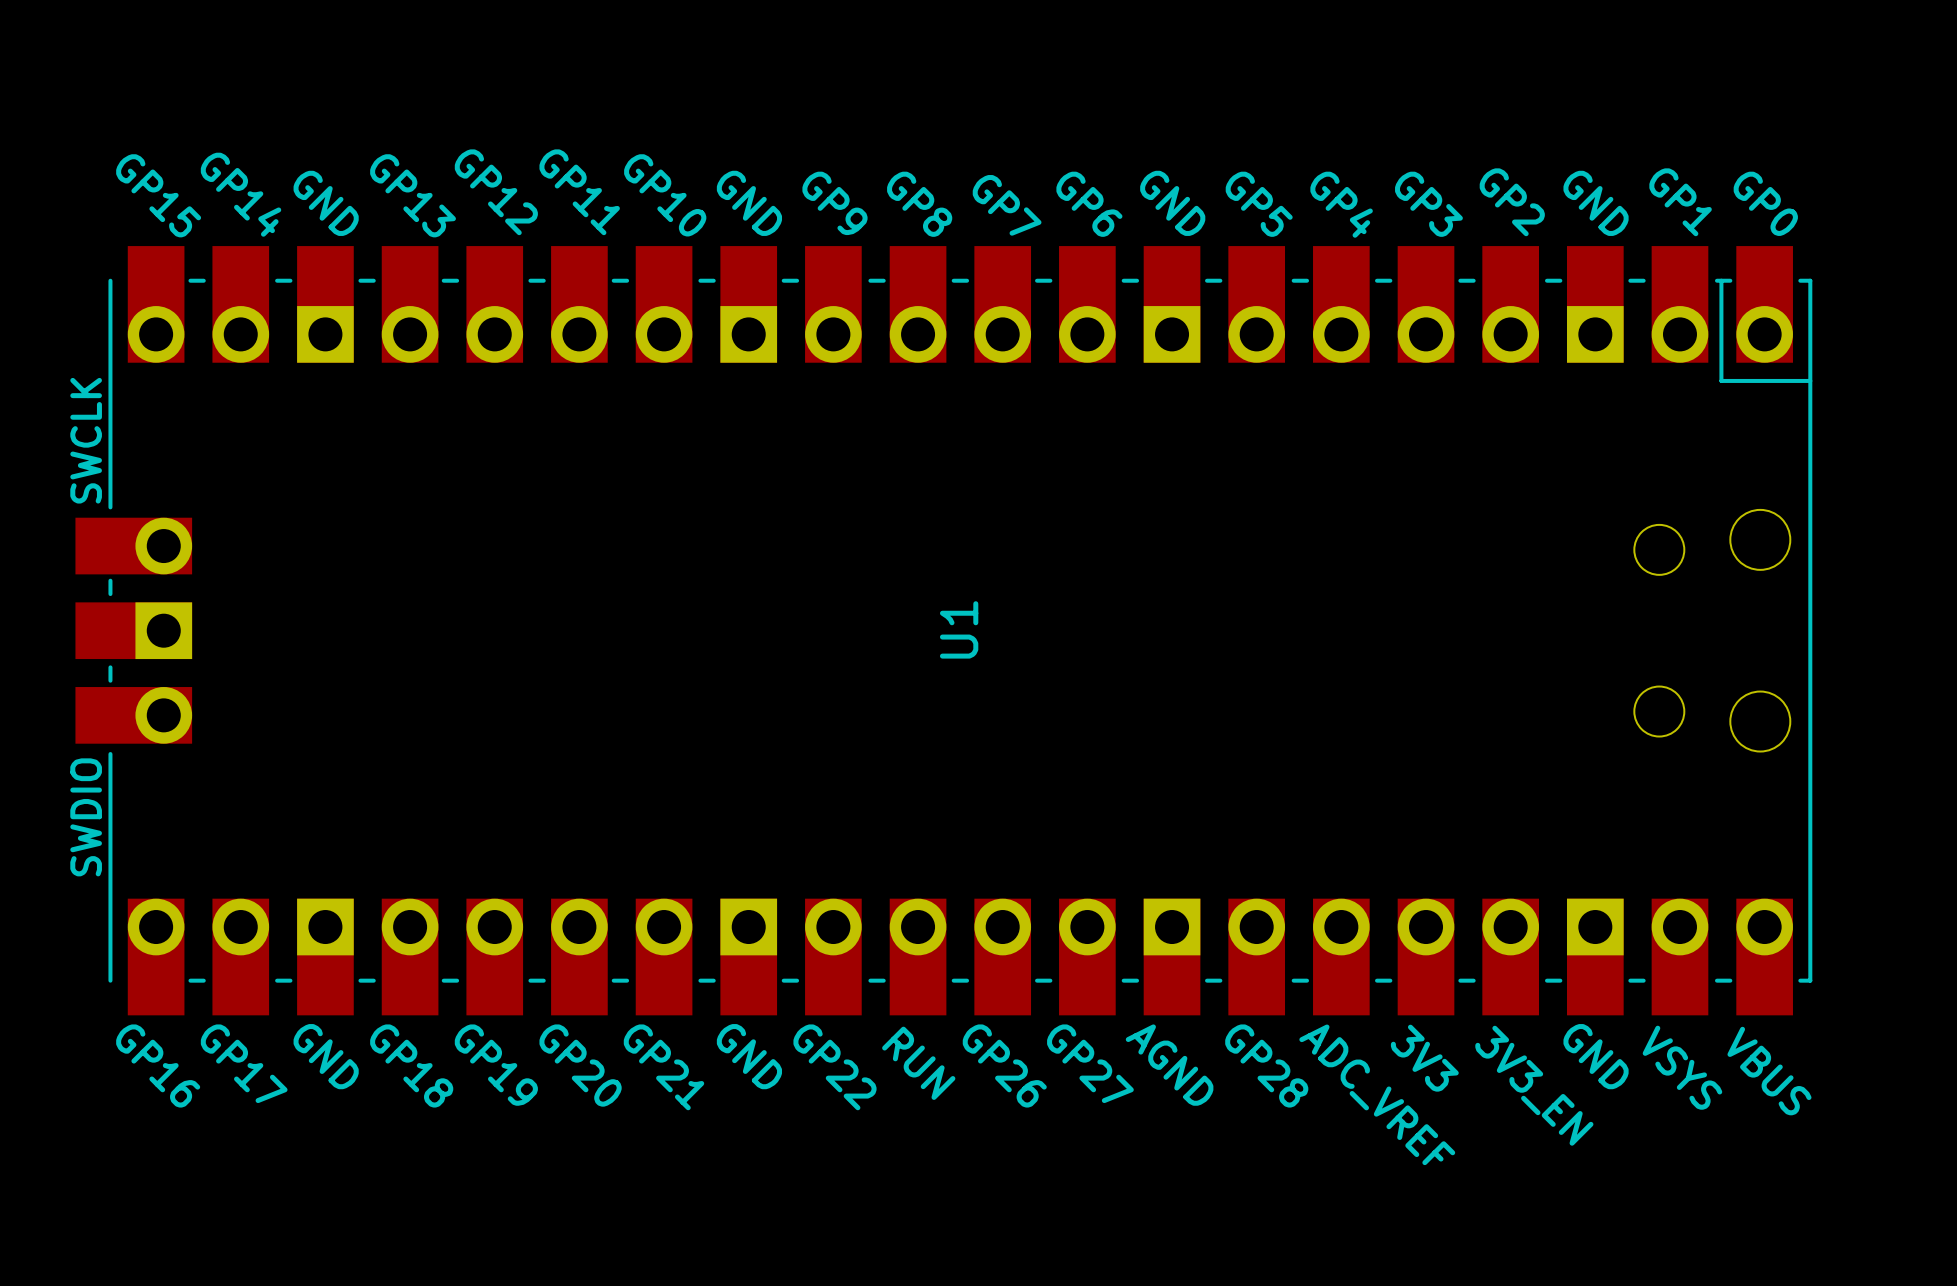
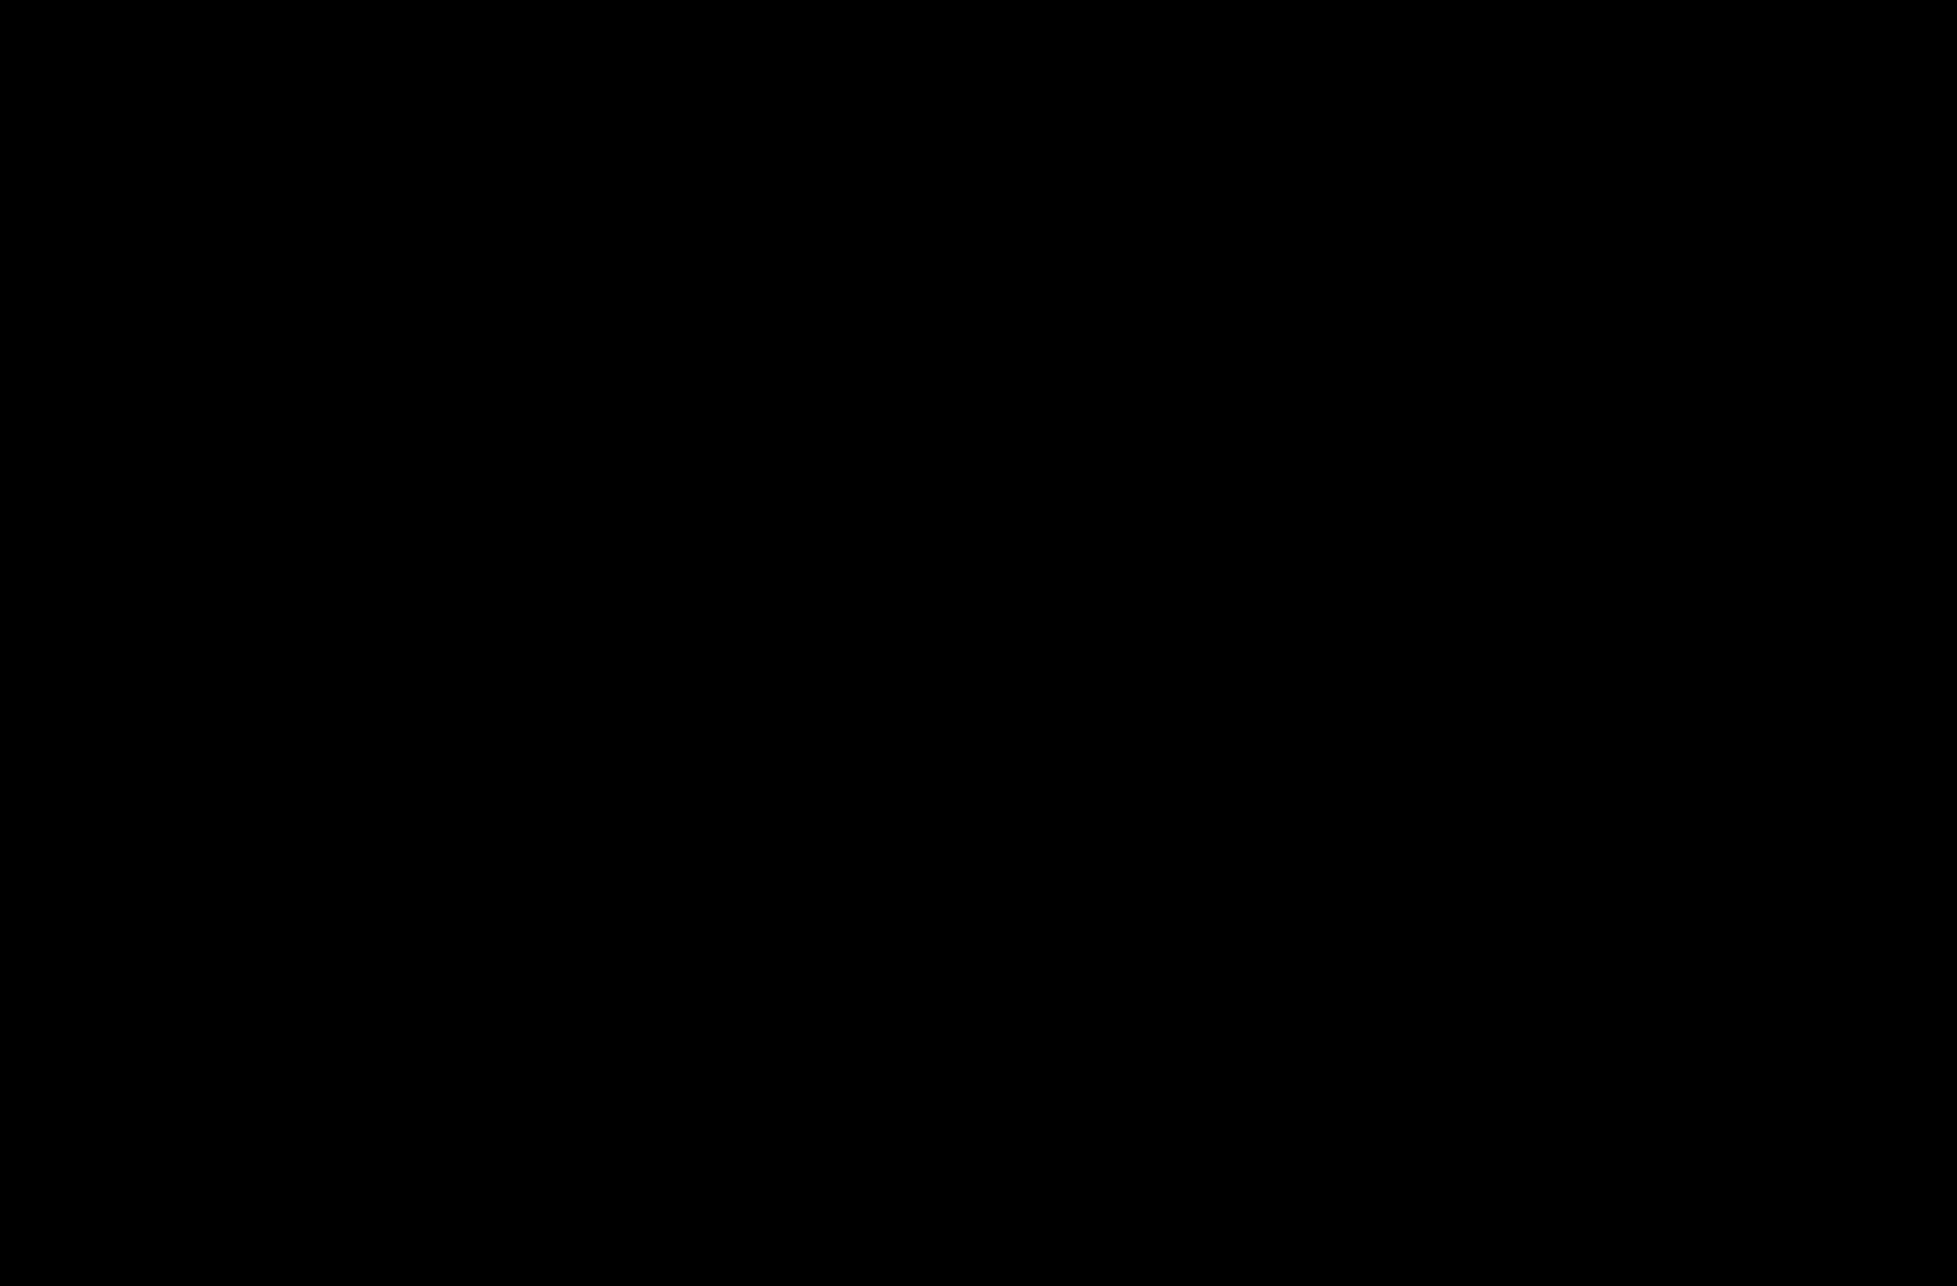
U1: (943, 630) -> none

